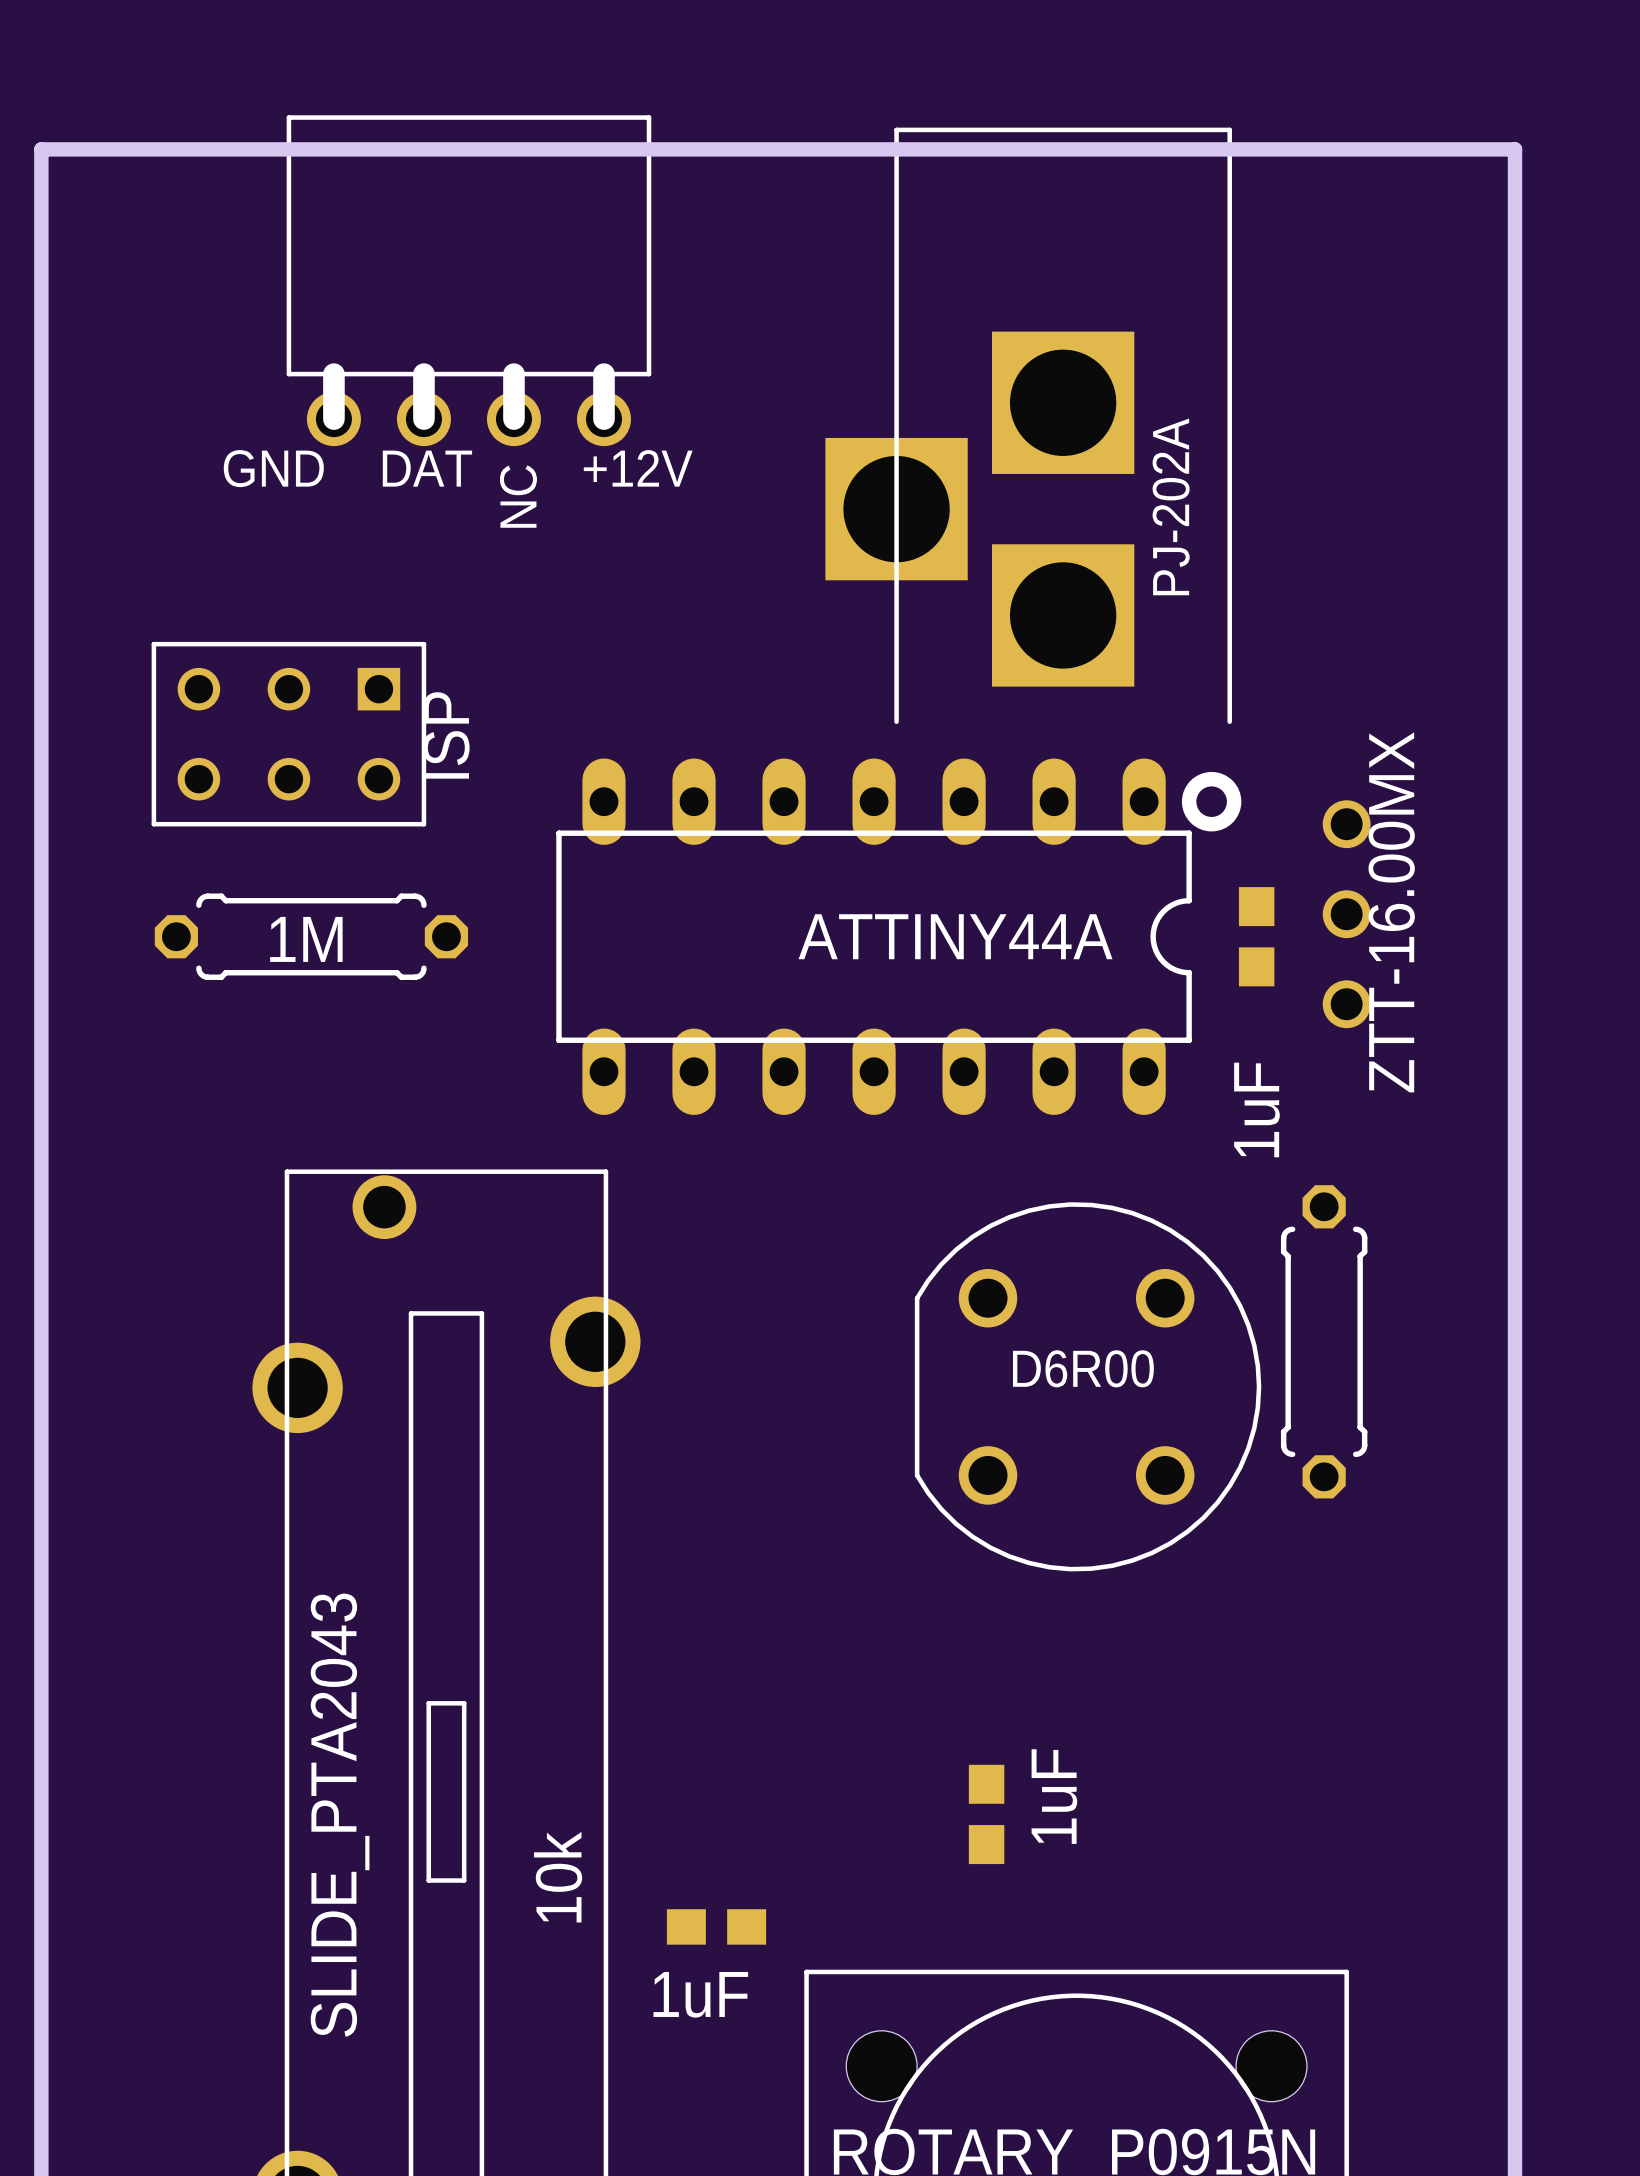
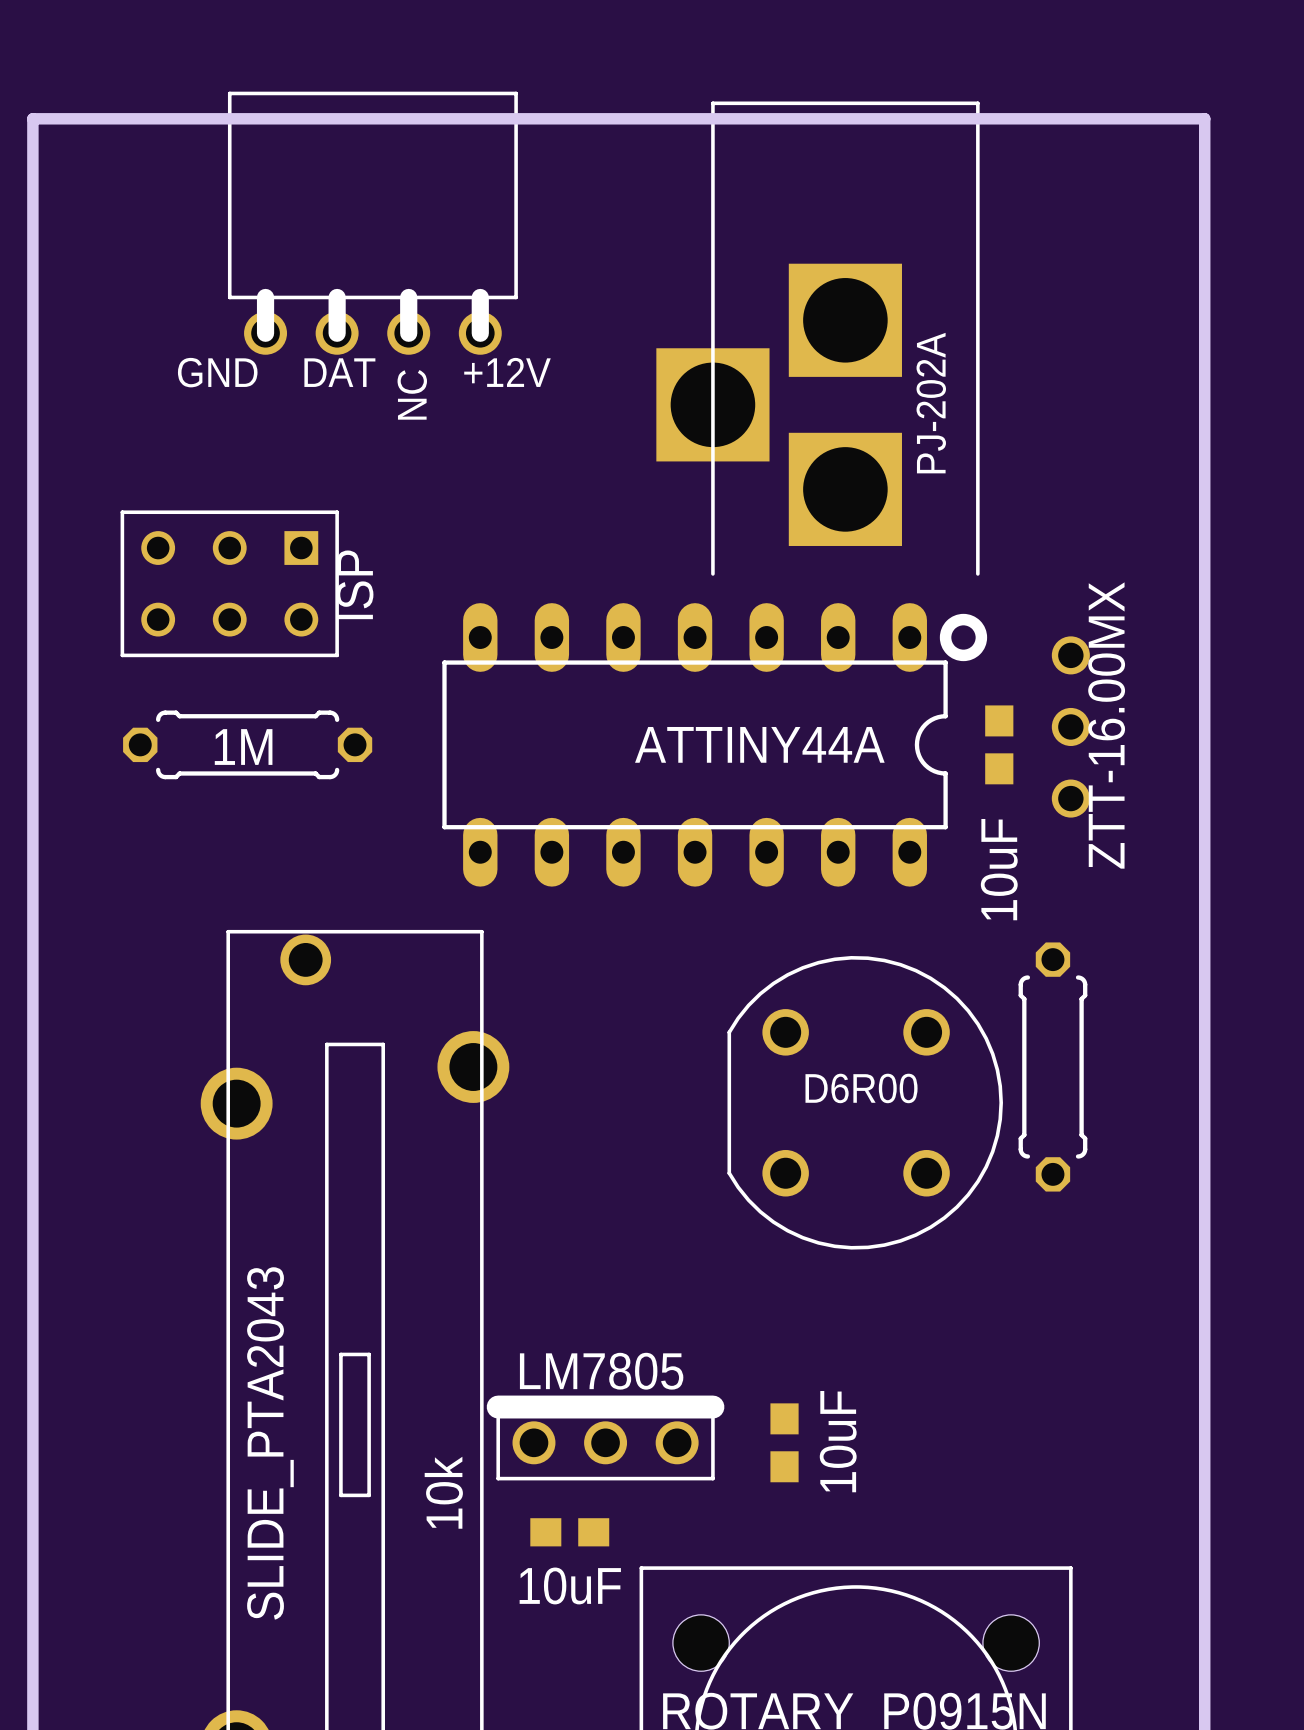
part value: 1uF (1256, 1109) -> 10uF (999, 869)
part value: 1uF (1054, 1796) -> 10uF (838, 1441)
part: none -> LM7805 (605, 1437)
part value: 1uF (700, 1994) -> 10uF (570, 1585)

